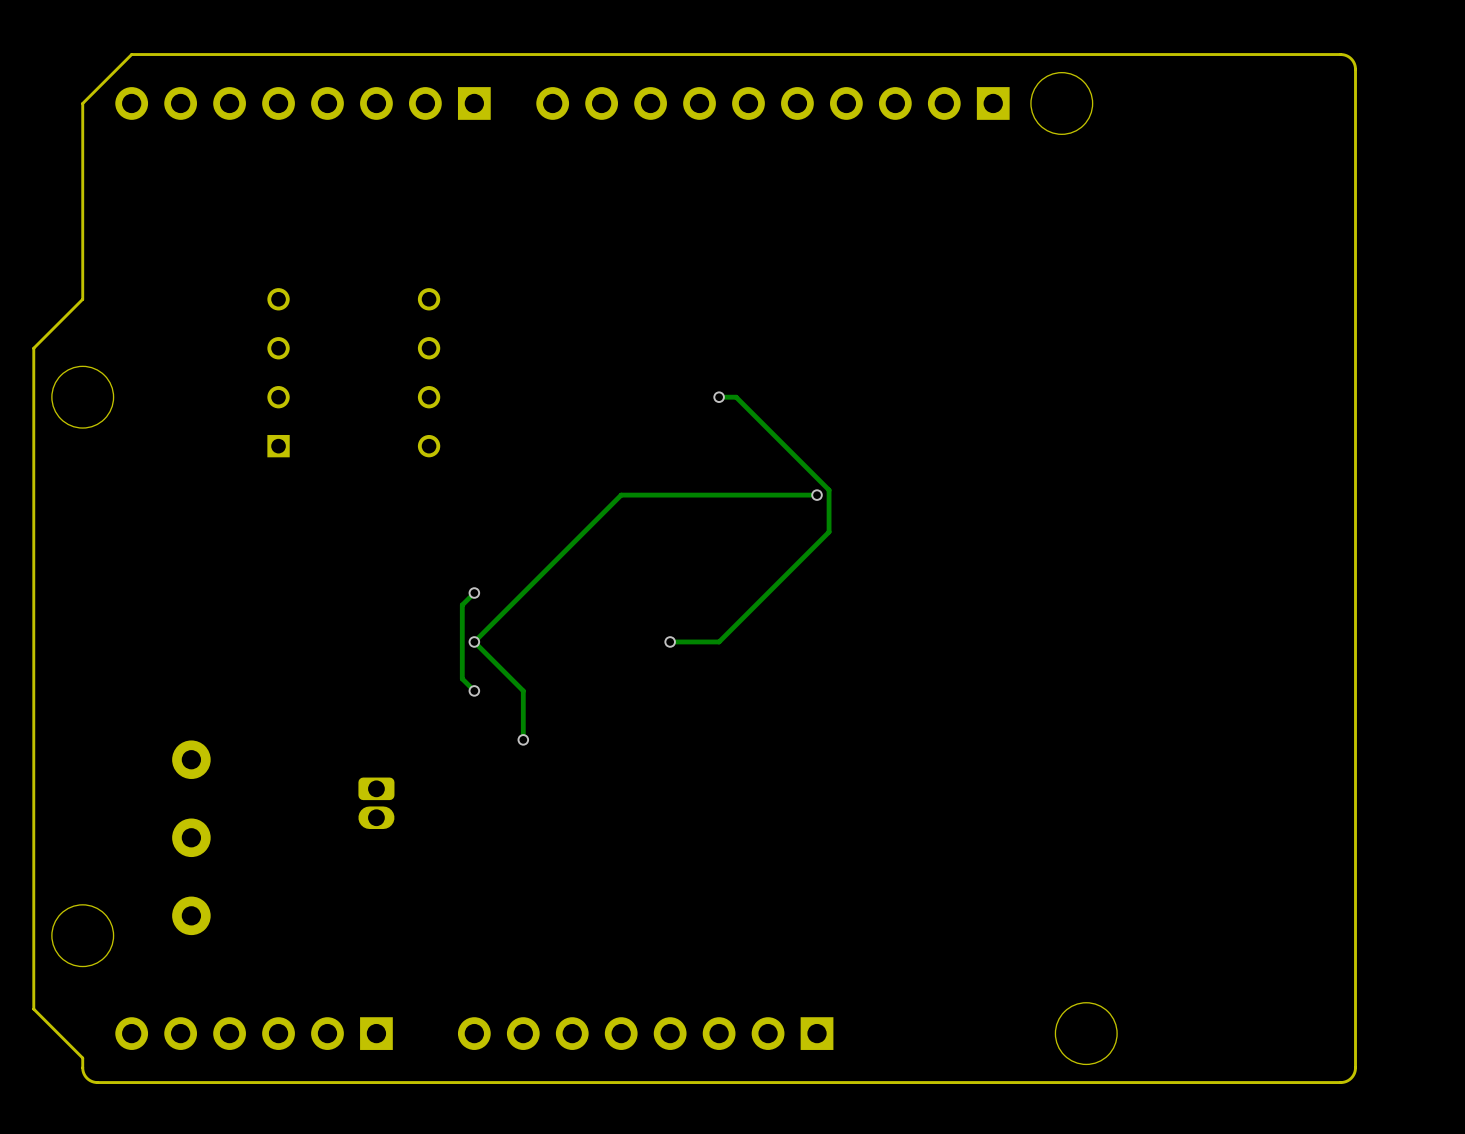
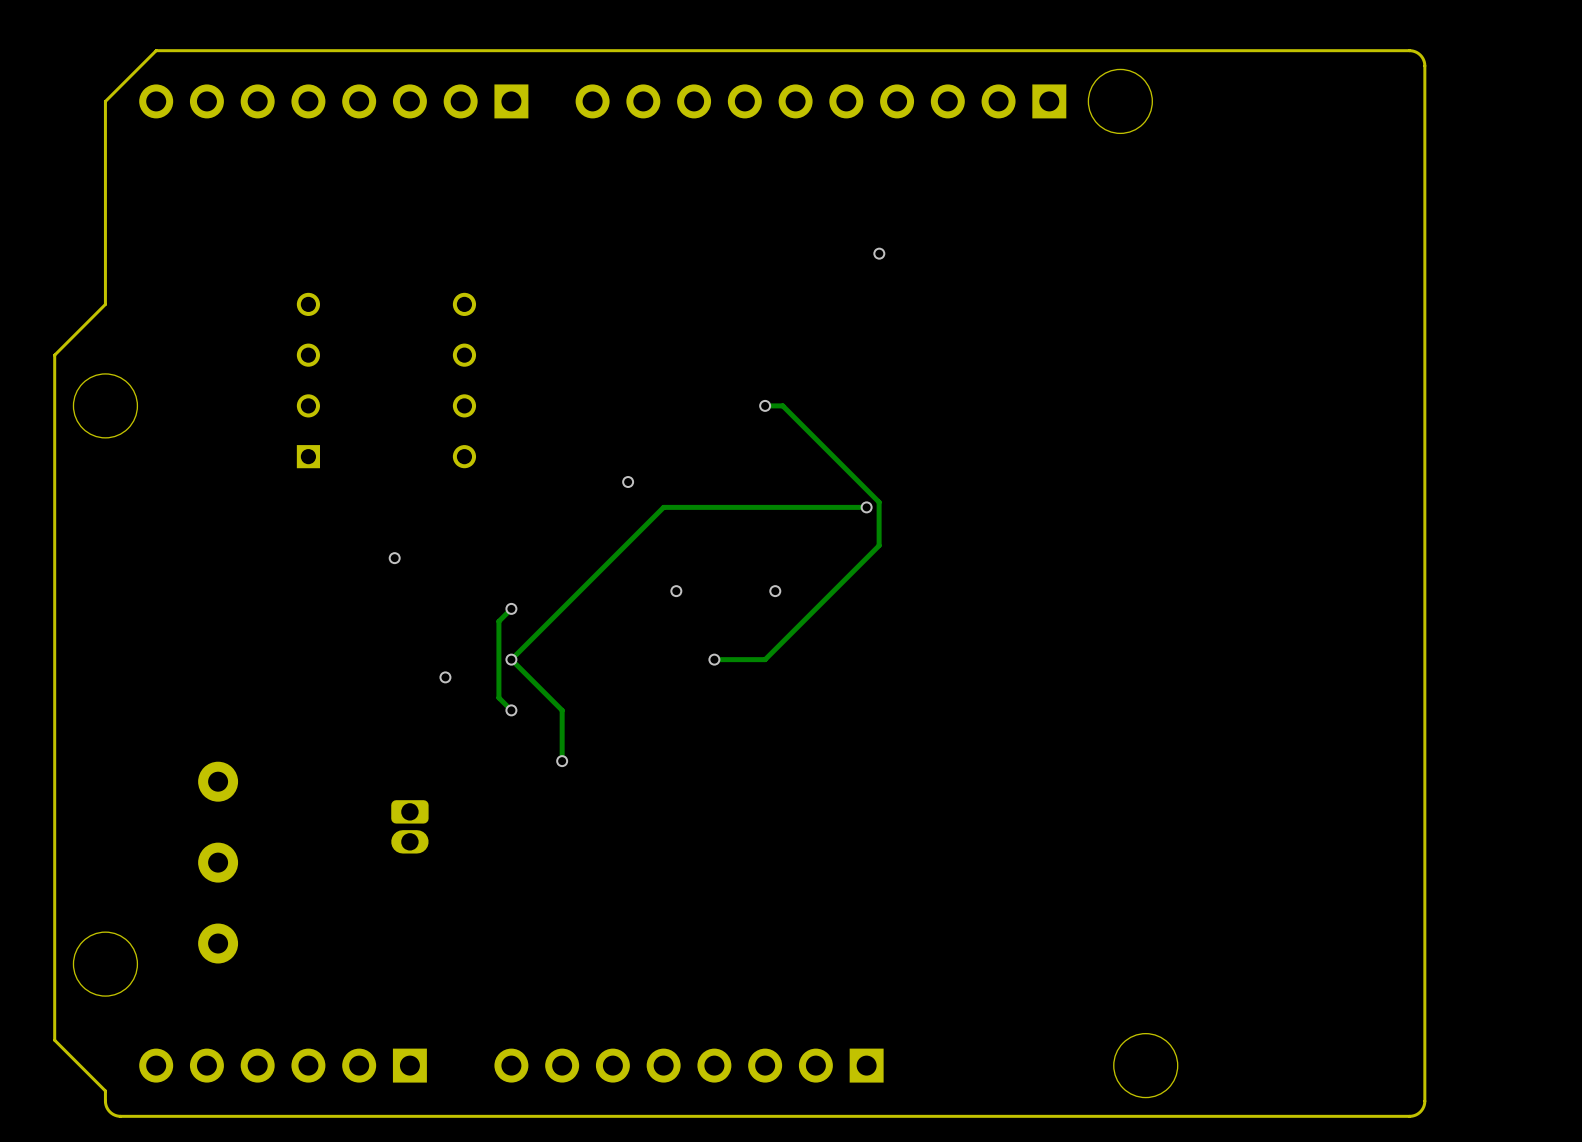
via: none -> (879, 253)
via: none -> (628, 482)
via: none -> (394, 558)
via: none -> (676, 591)
via: none -> (775, 591)
via: none -> (445, 677)

